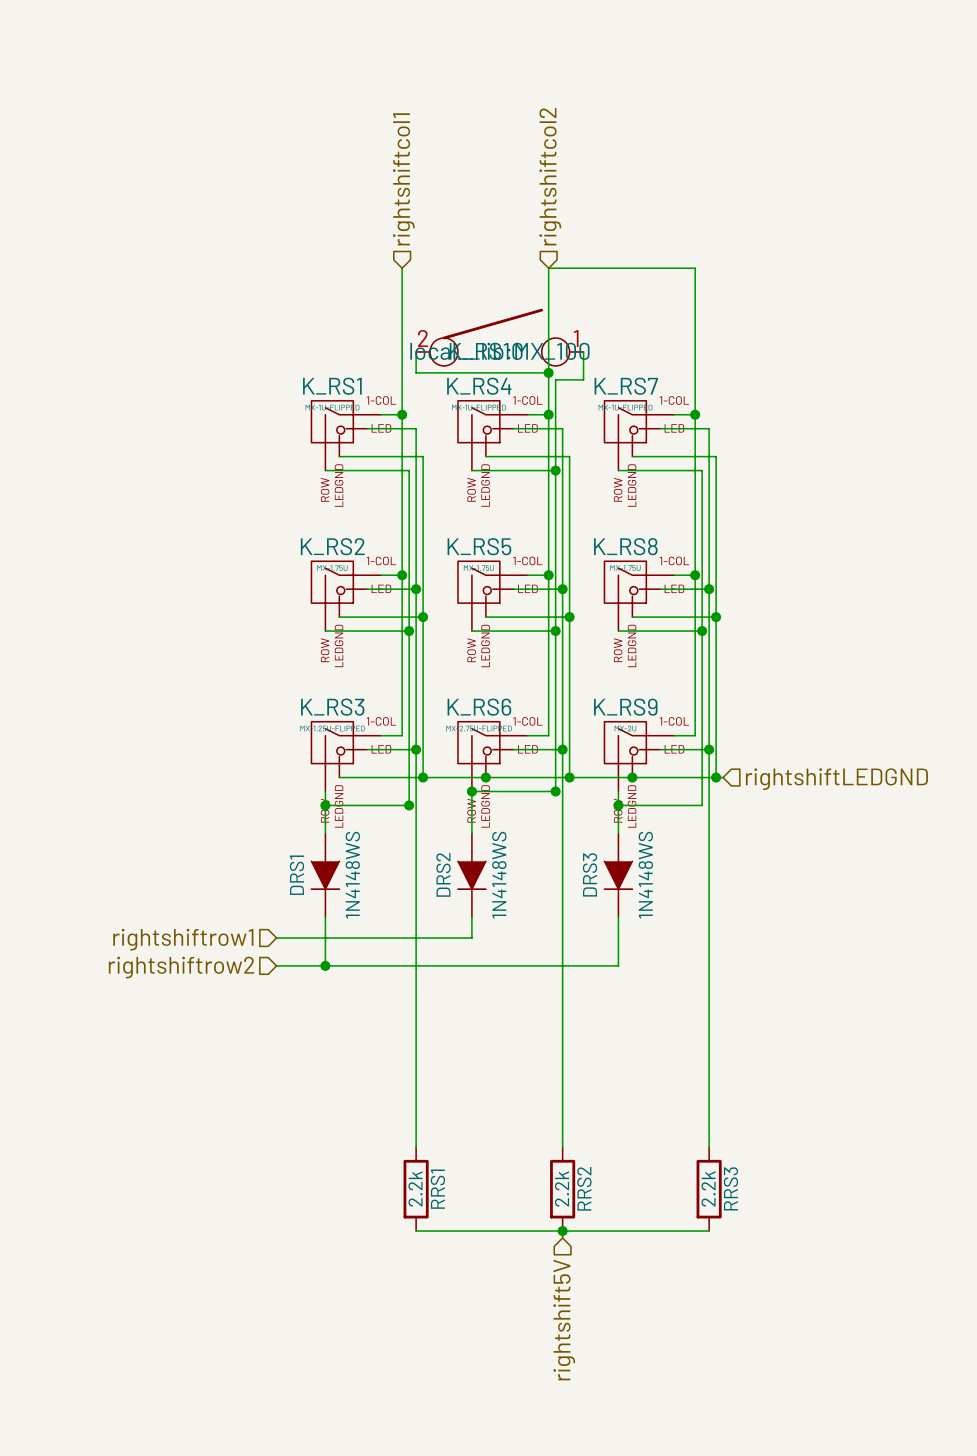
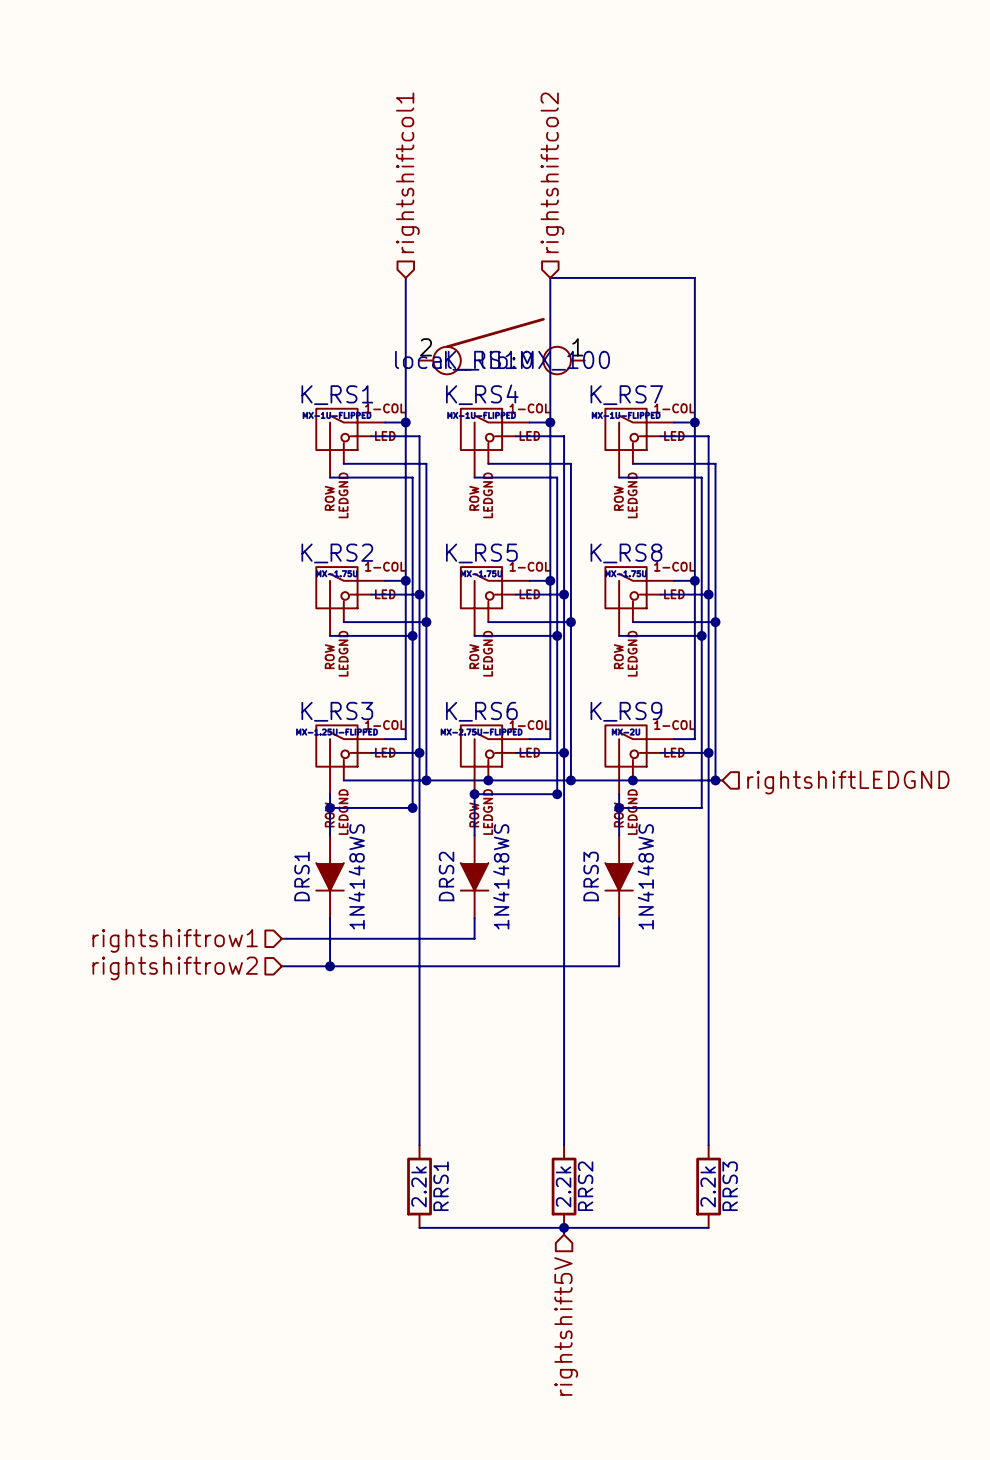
wire: (416, 351) (416, 372) (548, 372) -> none
wire: (583, 351) (583, 379) (555, 379) (555, 470) -> none
junction: (548, 372) -> none
junction: (555, 470) -> none

